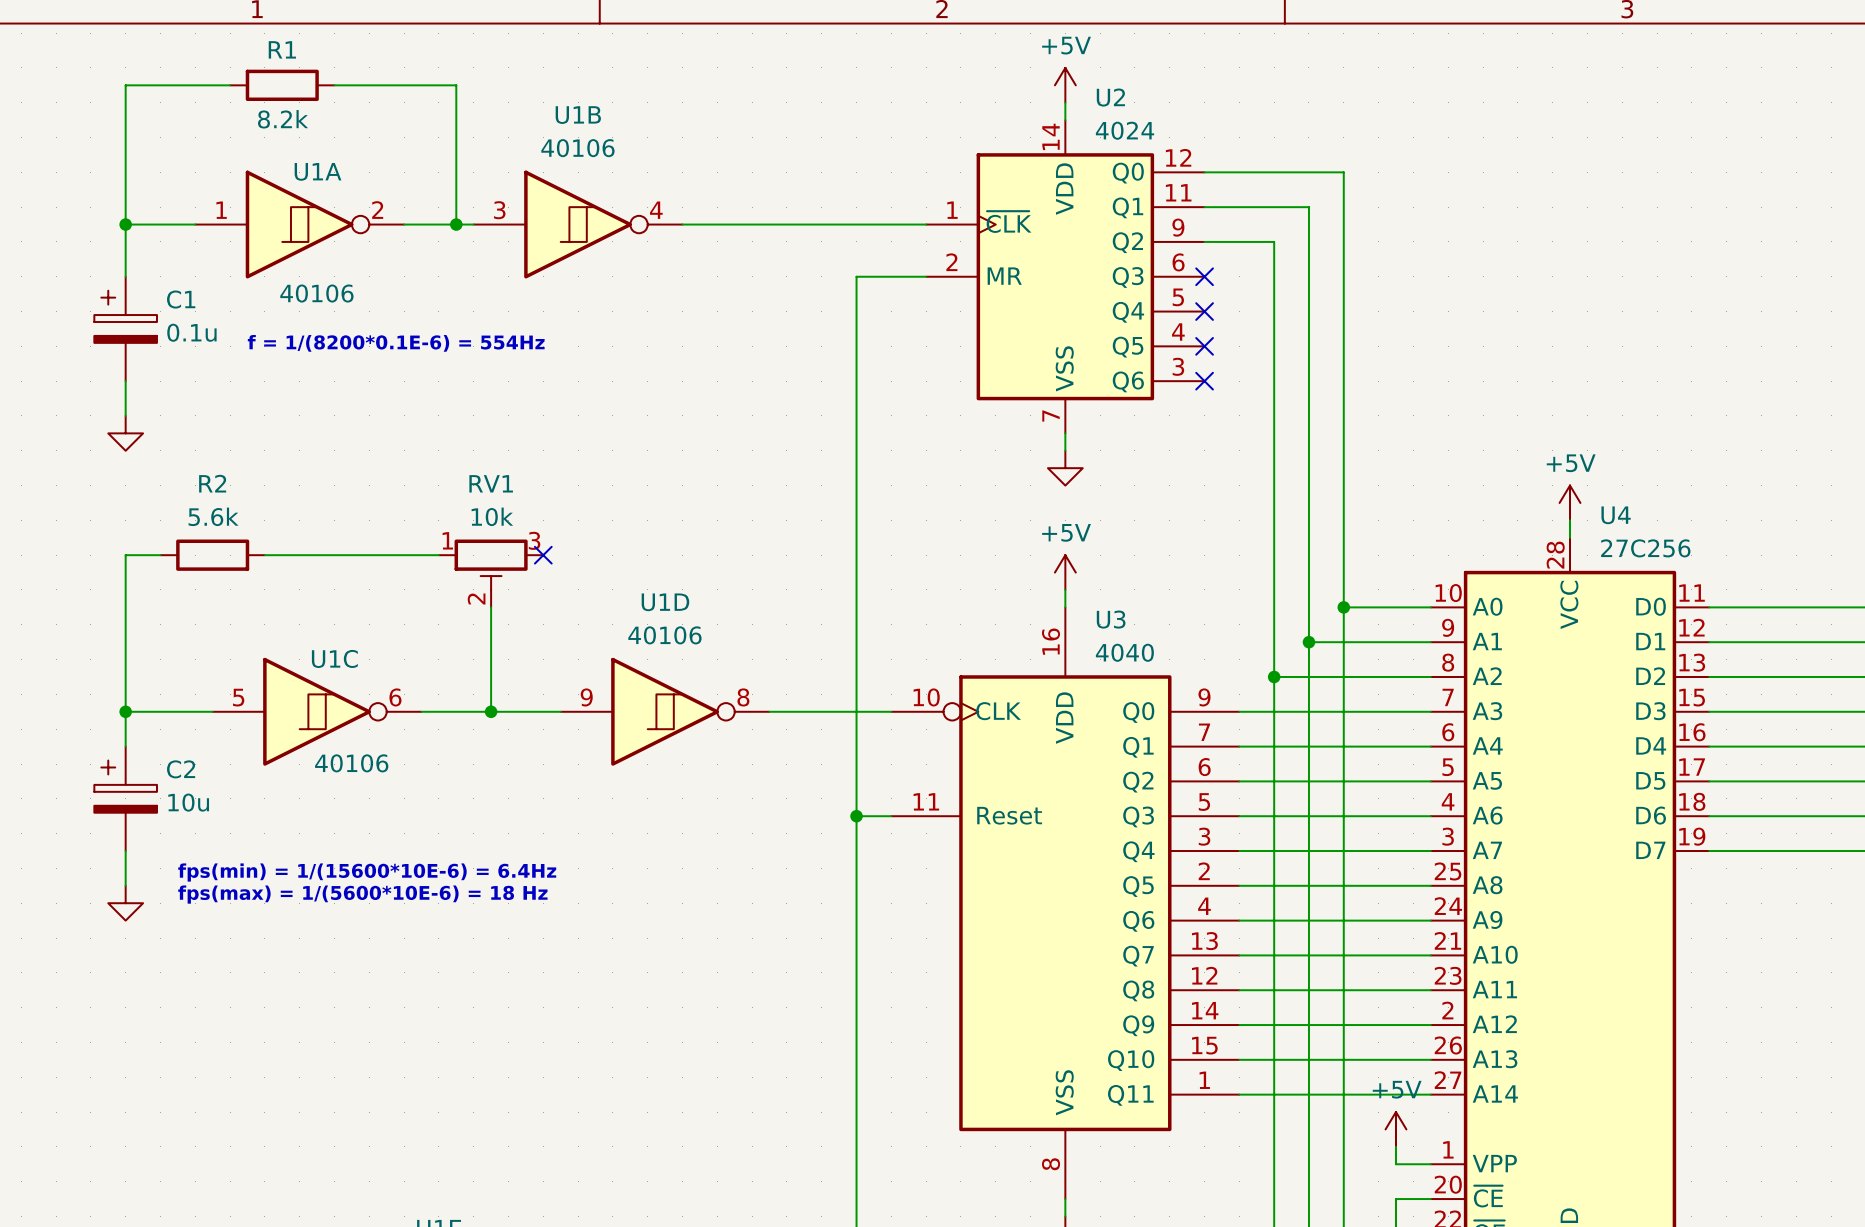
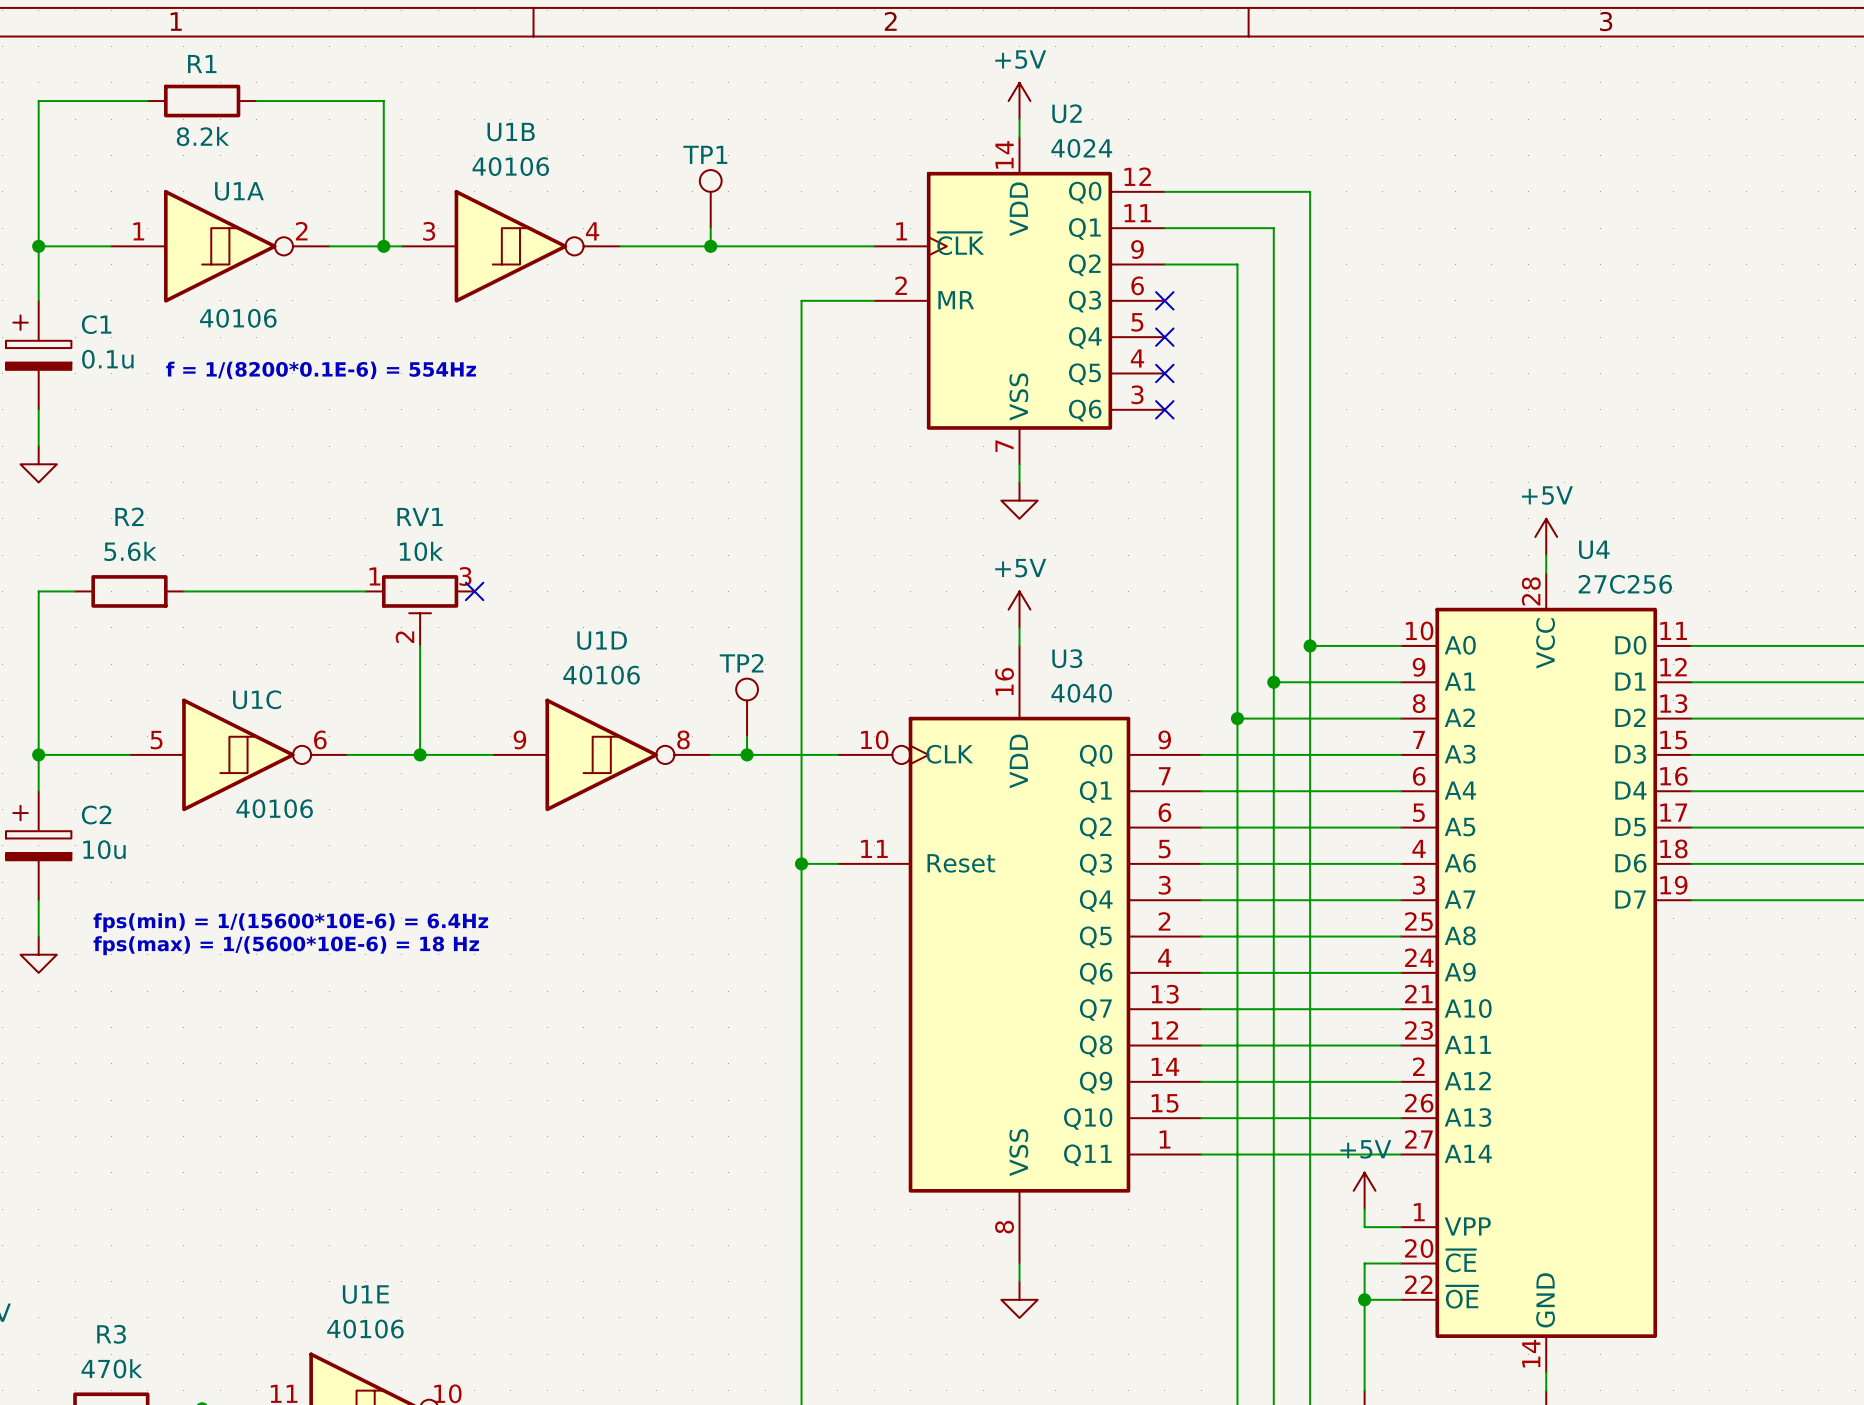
TP1: none -> (710, 199)
wire: none -> (710, 228) (710, 246)
junction: none -> (710, 246)
TP2: none -> (747, 707)
wire: none -> (747, 736) (747, 754)
junction: none -> (747, 754)

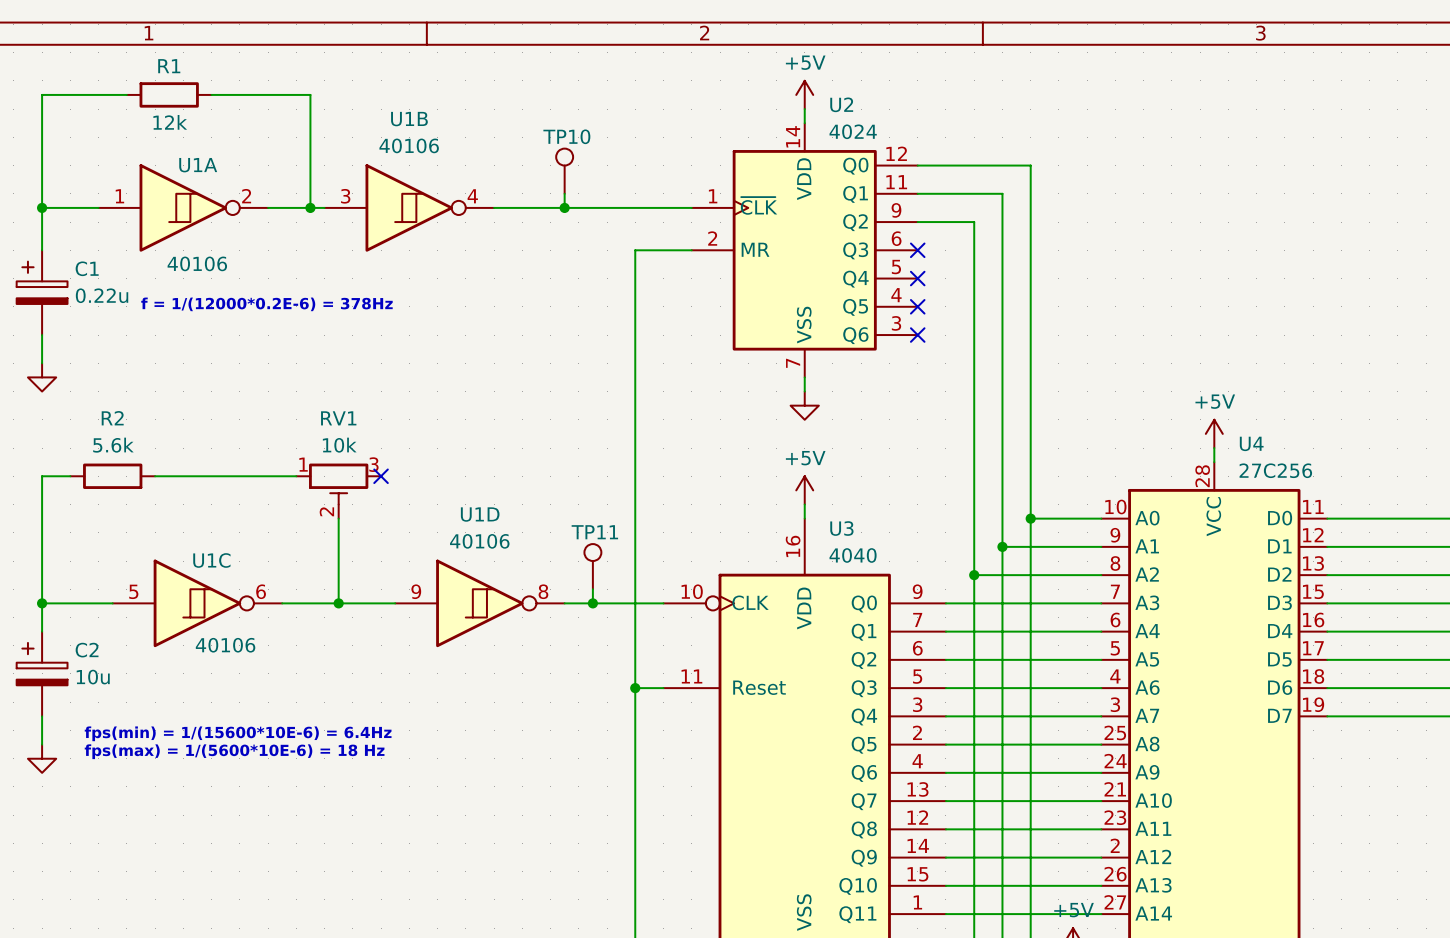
R1 value: 8.2k (202, 136) -> 12k (170, 122)
TP1 name: TP1 (705, 154) -> TP10 (566, 136)
C1 value: 0.1u (107, 359) -> 0.22u (102, 295)
text: f = 1/(8200*0.1E-6) = 554Hz (321, 370) -> f = 1/(12000*0.2E-6) = 378Hz (266, 304)
TP2 name: TP2 (741, 663) -> TP11 (594, 532)

